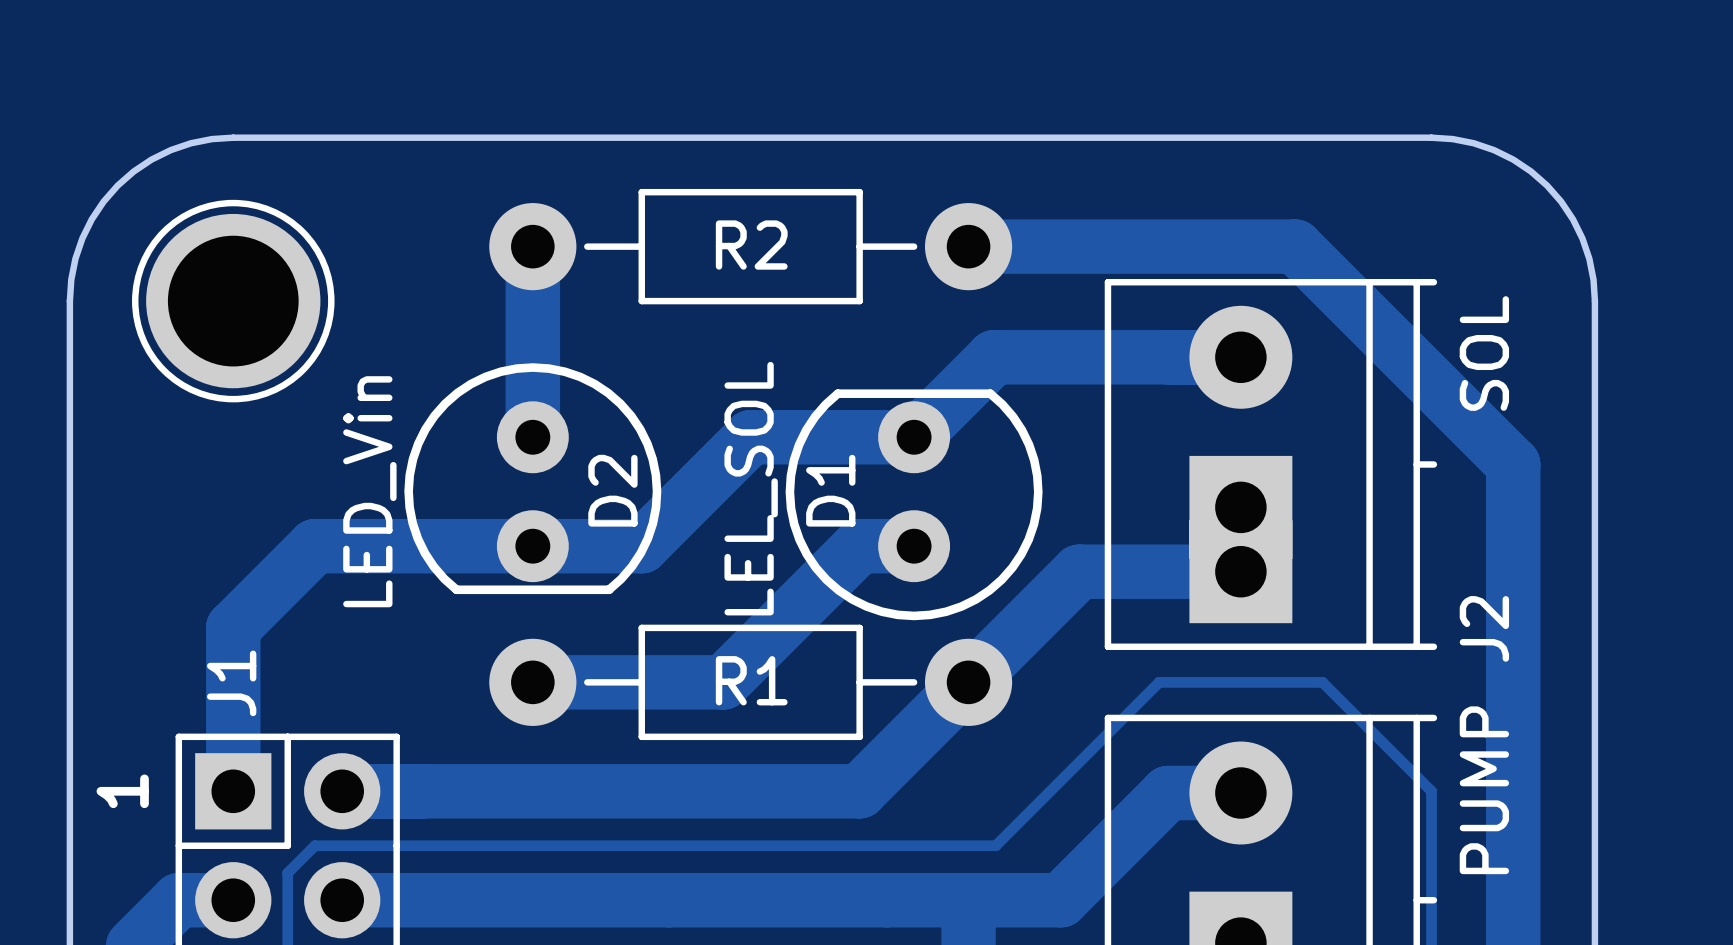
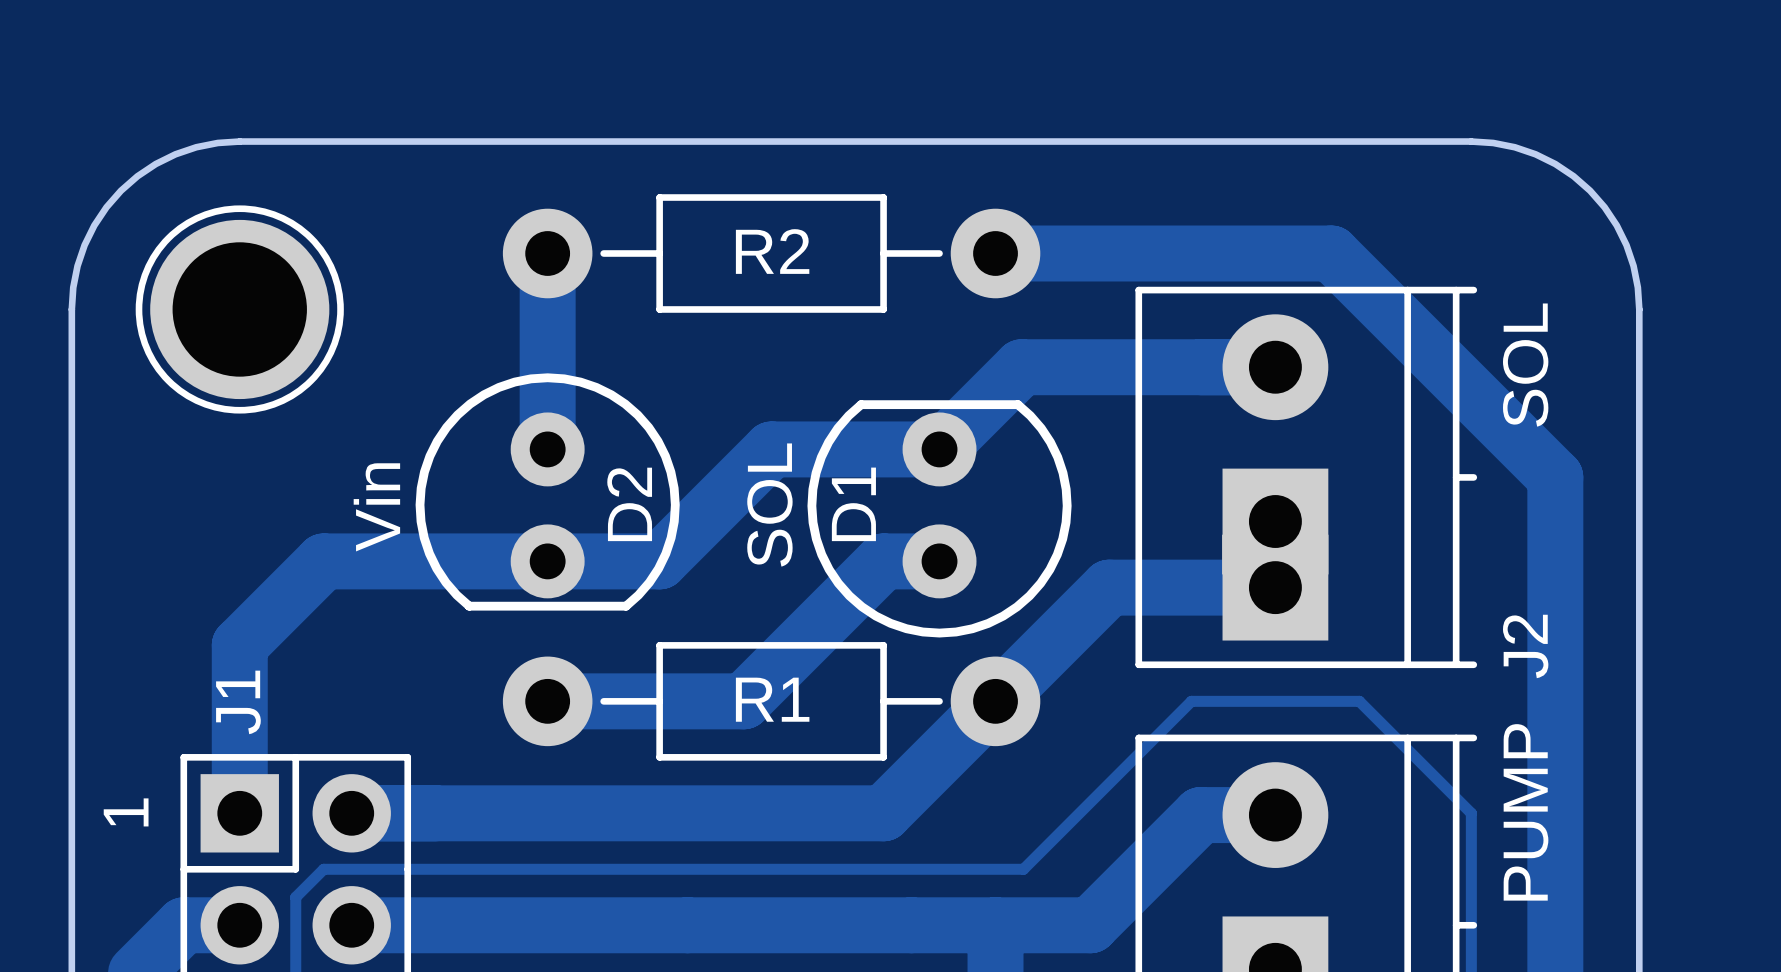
D1 value: LEL_SOL (751, 488) -> SOL (769, 505)
D2 value: LED_Vin (369, 491) -> Vin (376, 507)

